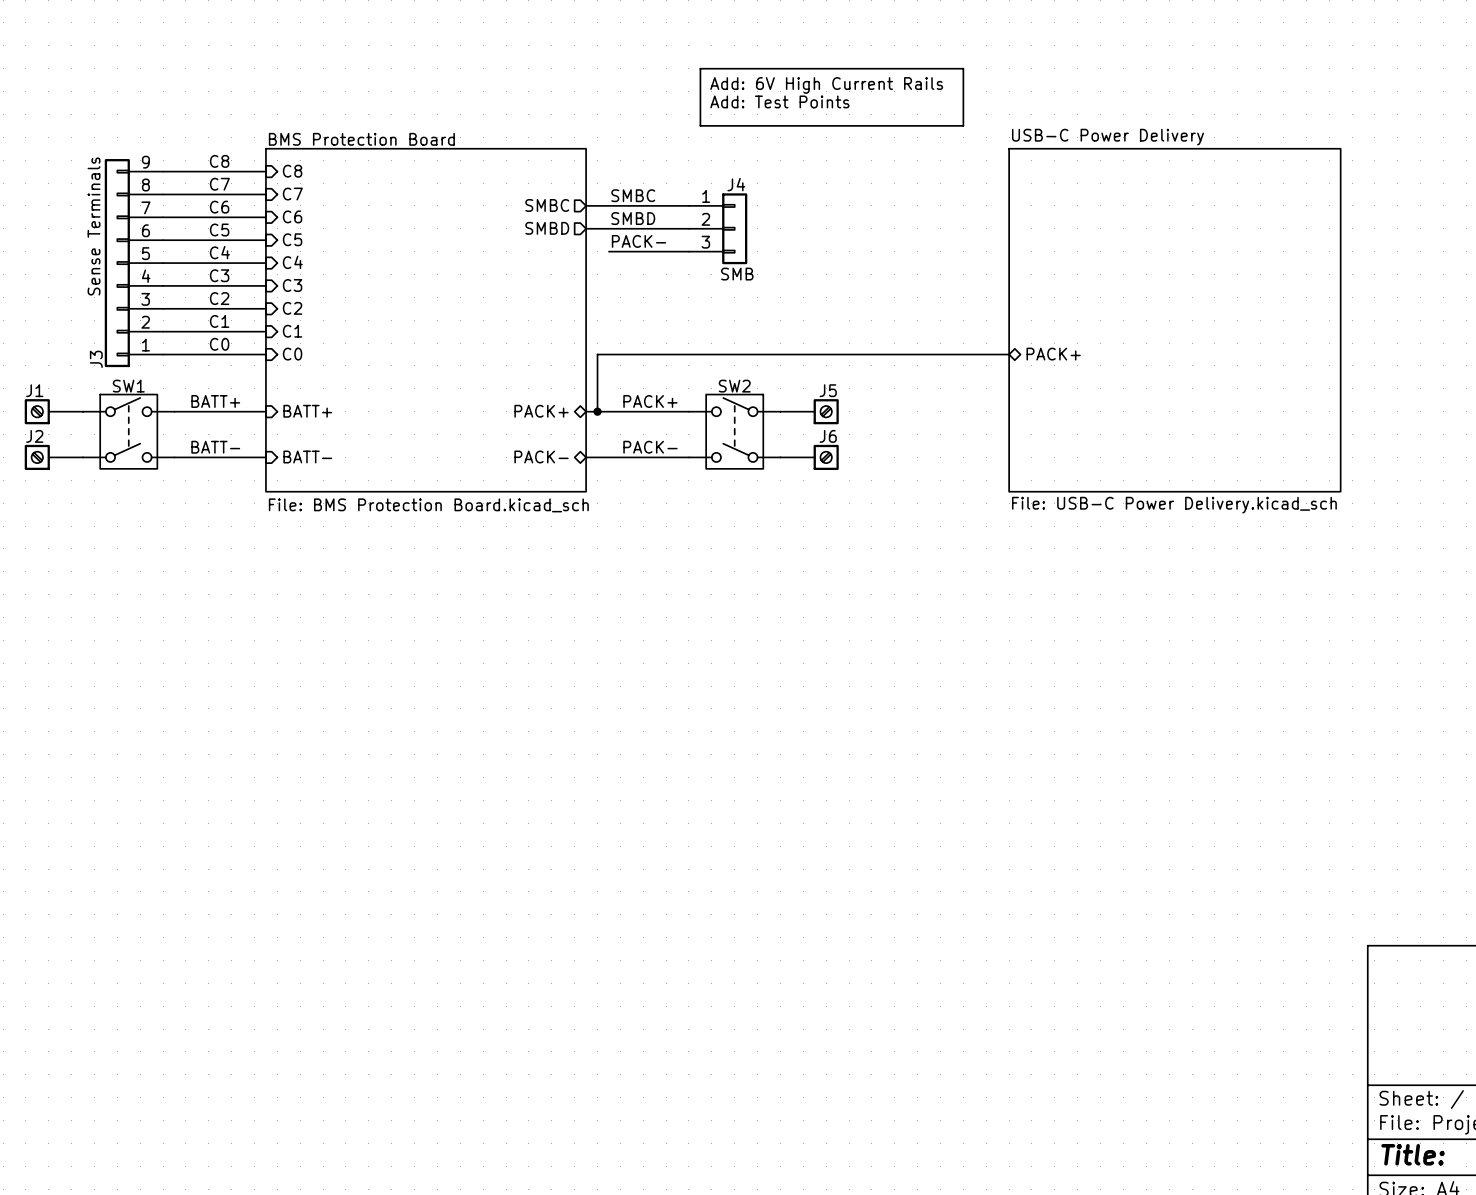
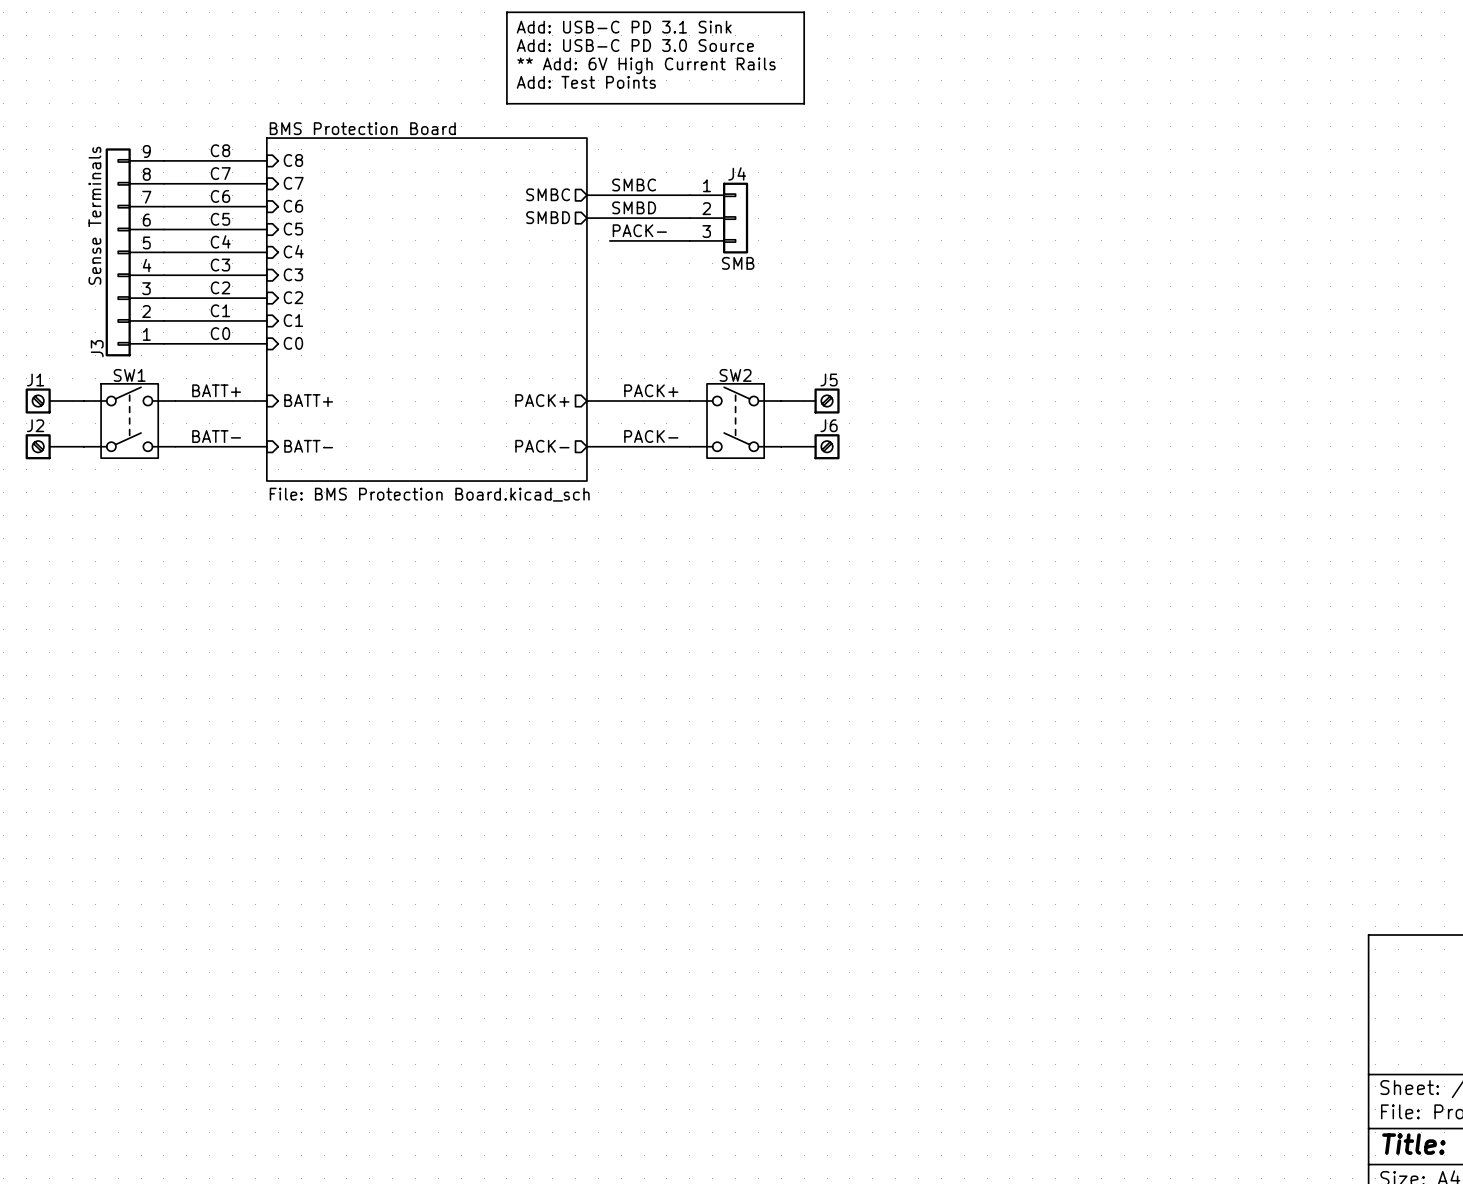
line: none -> (506, 12) (804, 12) (804, 103) (506, 103) (506, 12)
text: none -> Add: USB-C PD 3.1 Sink (624, 27)
text: none -> Add: USB-C PD 3.0 Source (635, 45)
line: (700, 68) (963, 68) (963, 125) (700, 125) (700, 68) -> none
text: Add: 6V High Current Rails (826, 85) -> ** Add: 6V High Current Rails (646, 65)
text position: Add: Test Points (779, 101) -> Add: Test Points (586, 82)
sheet USB-C Power Delivery: File: USB-C Power Delivery.kicad_sch (1174, 320) -> none
wire: (1009, 354) (597, 354) (597, 411) -> none
sheet pin: PACK+ (1053, 354) -> none
sheet pin shape: bidirectional (541, 411) -> output (542, 400)
junction: (597, 411) -> none
sheet pin shape: bidirectional (541, 457) -> output (542, 446)

